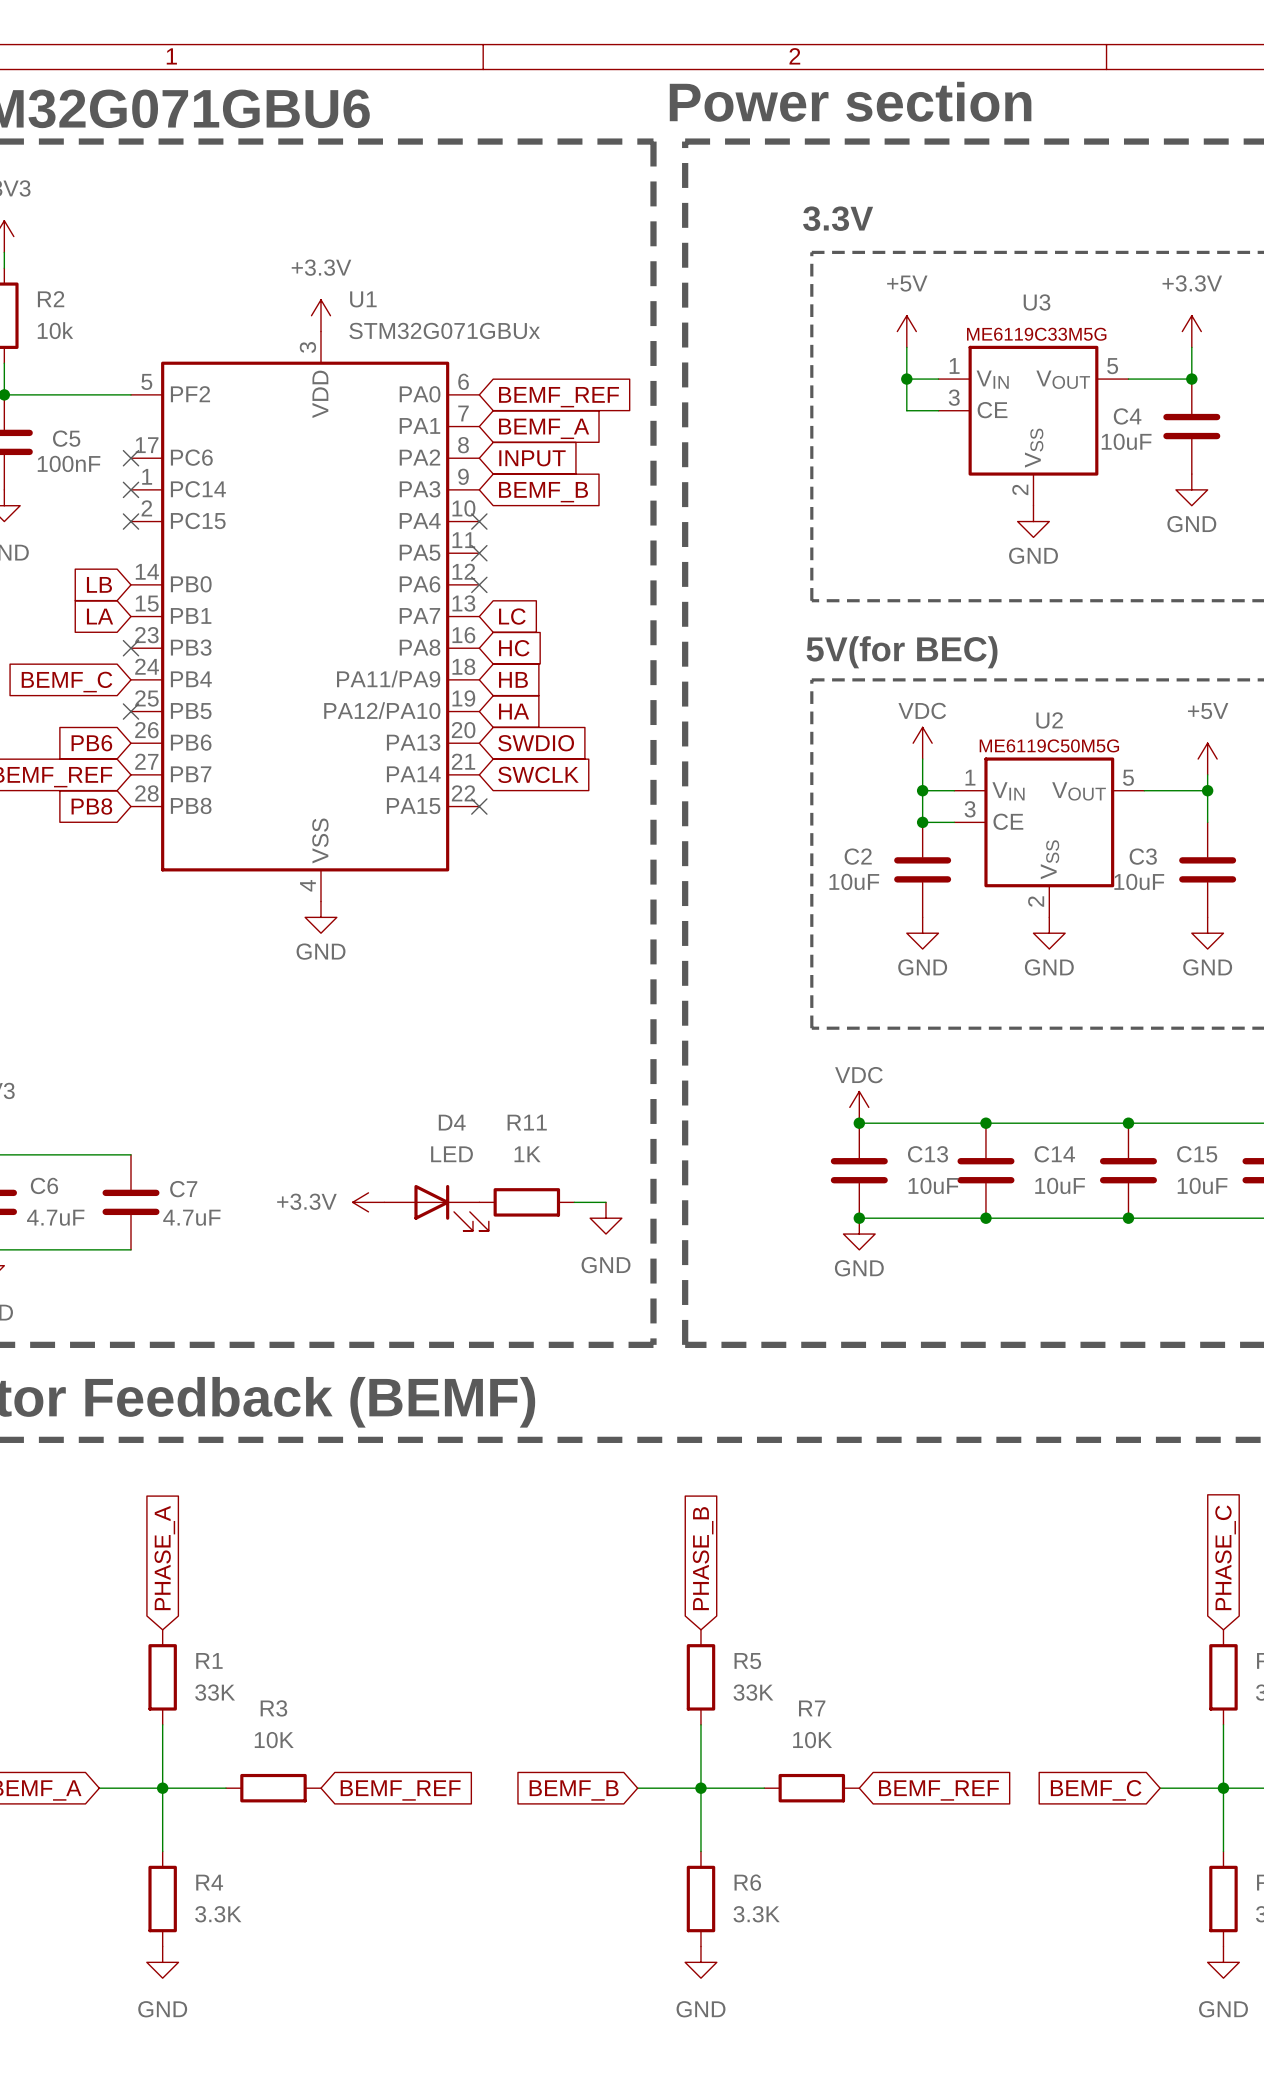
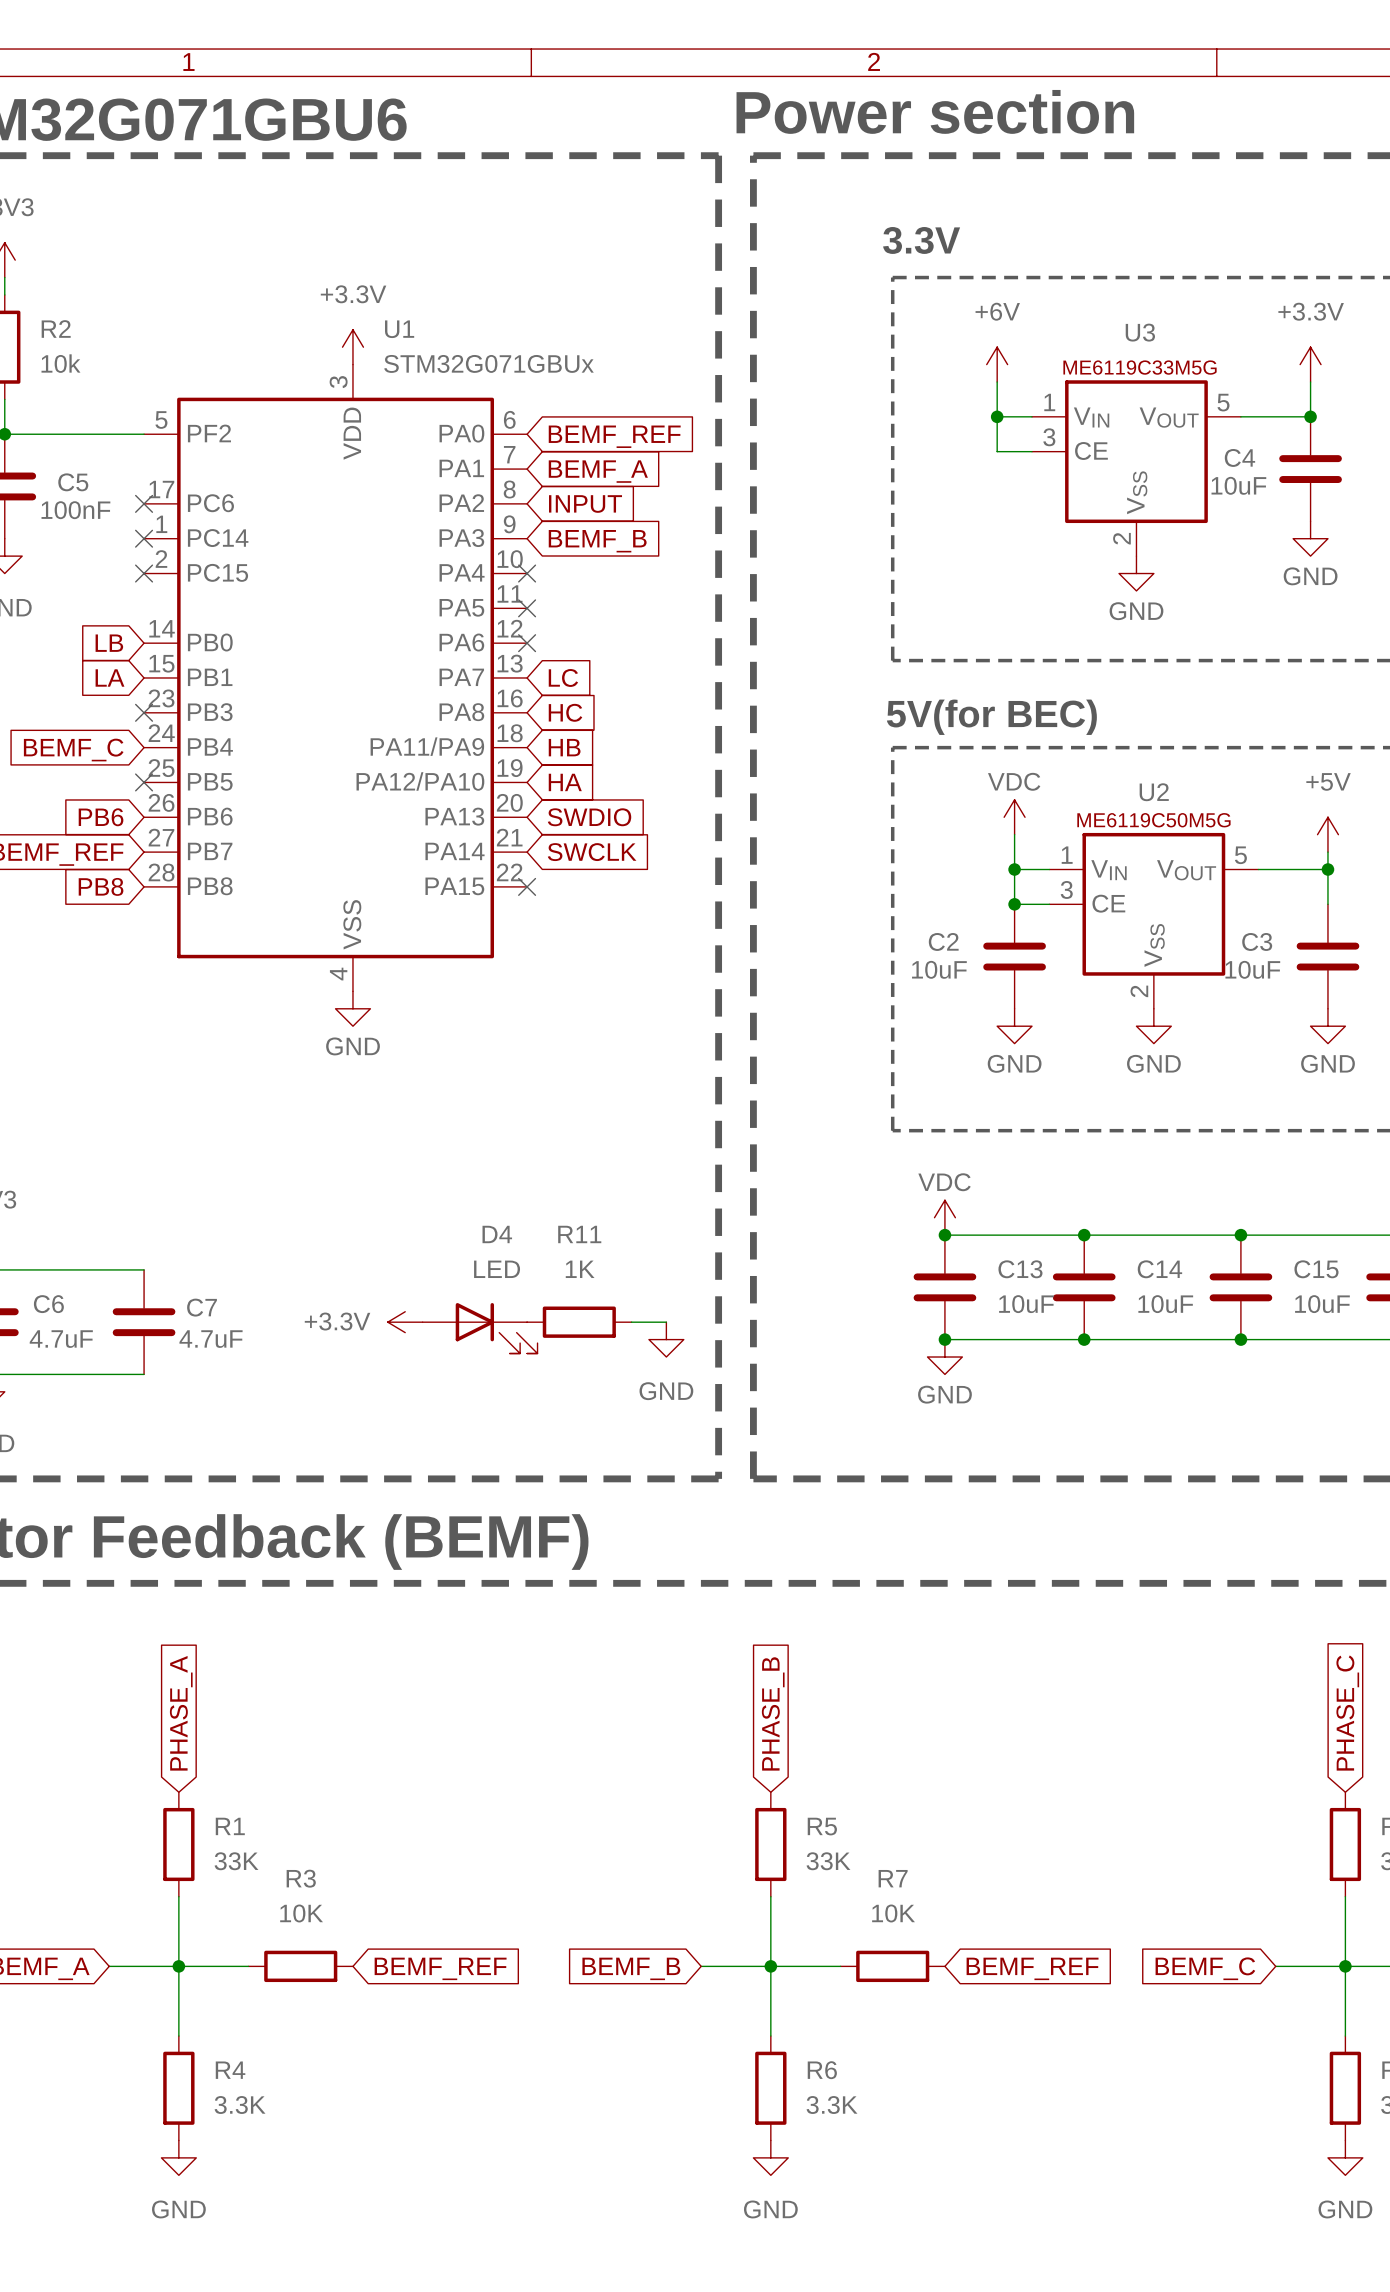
power symbol: +5V (906, 331) -> +6V (997, 364)

